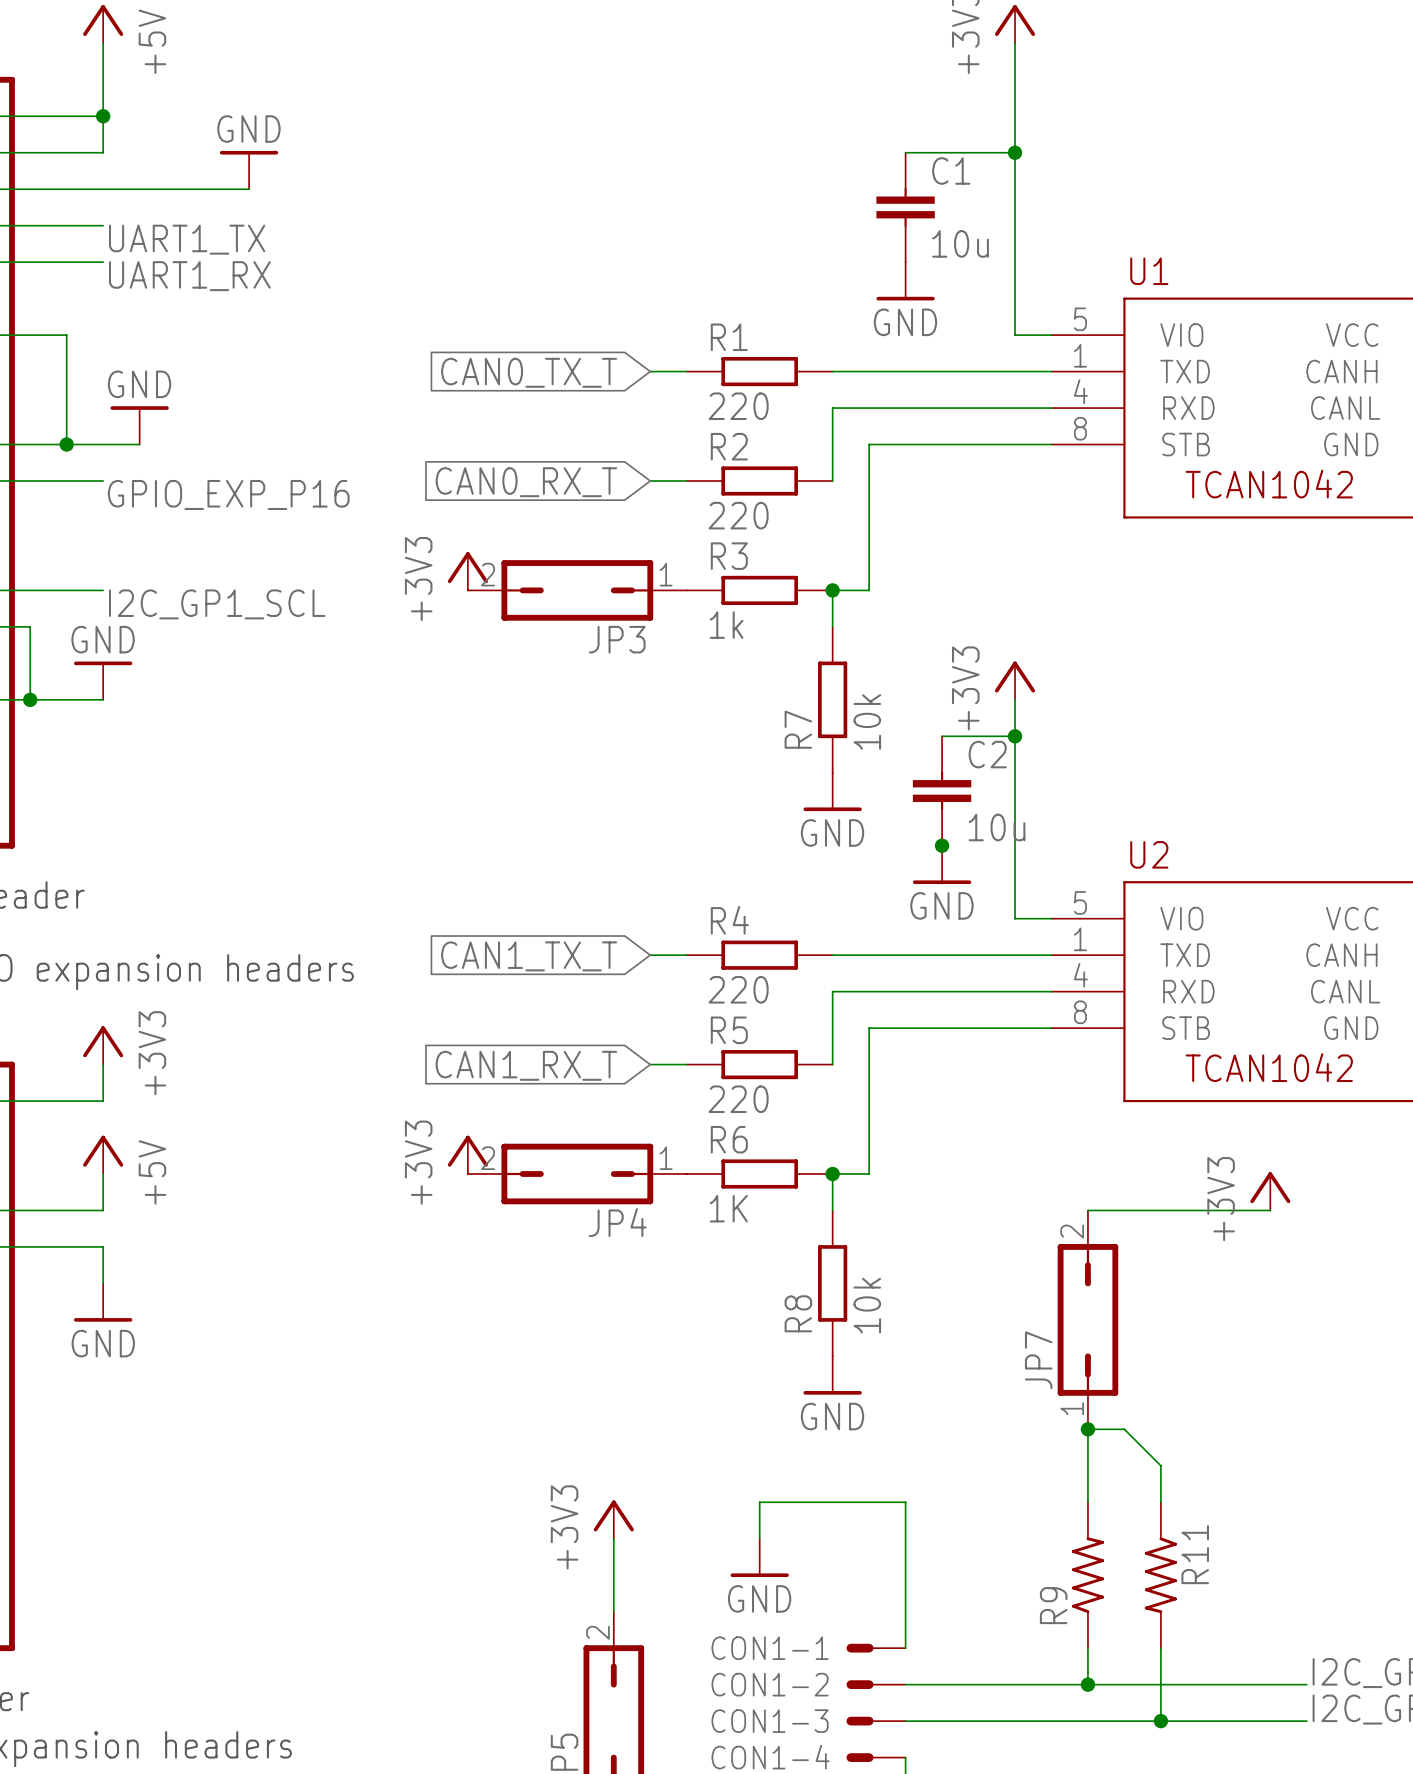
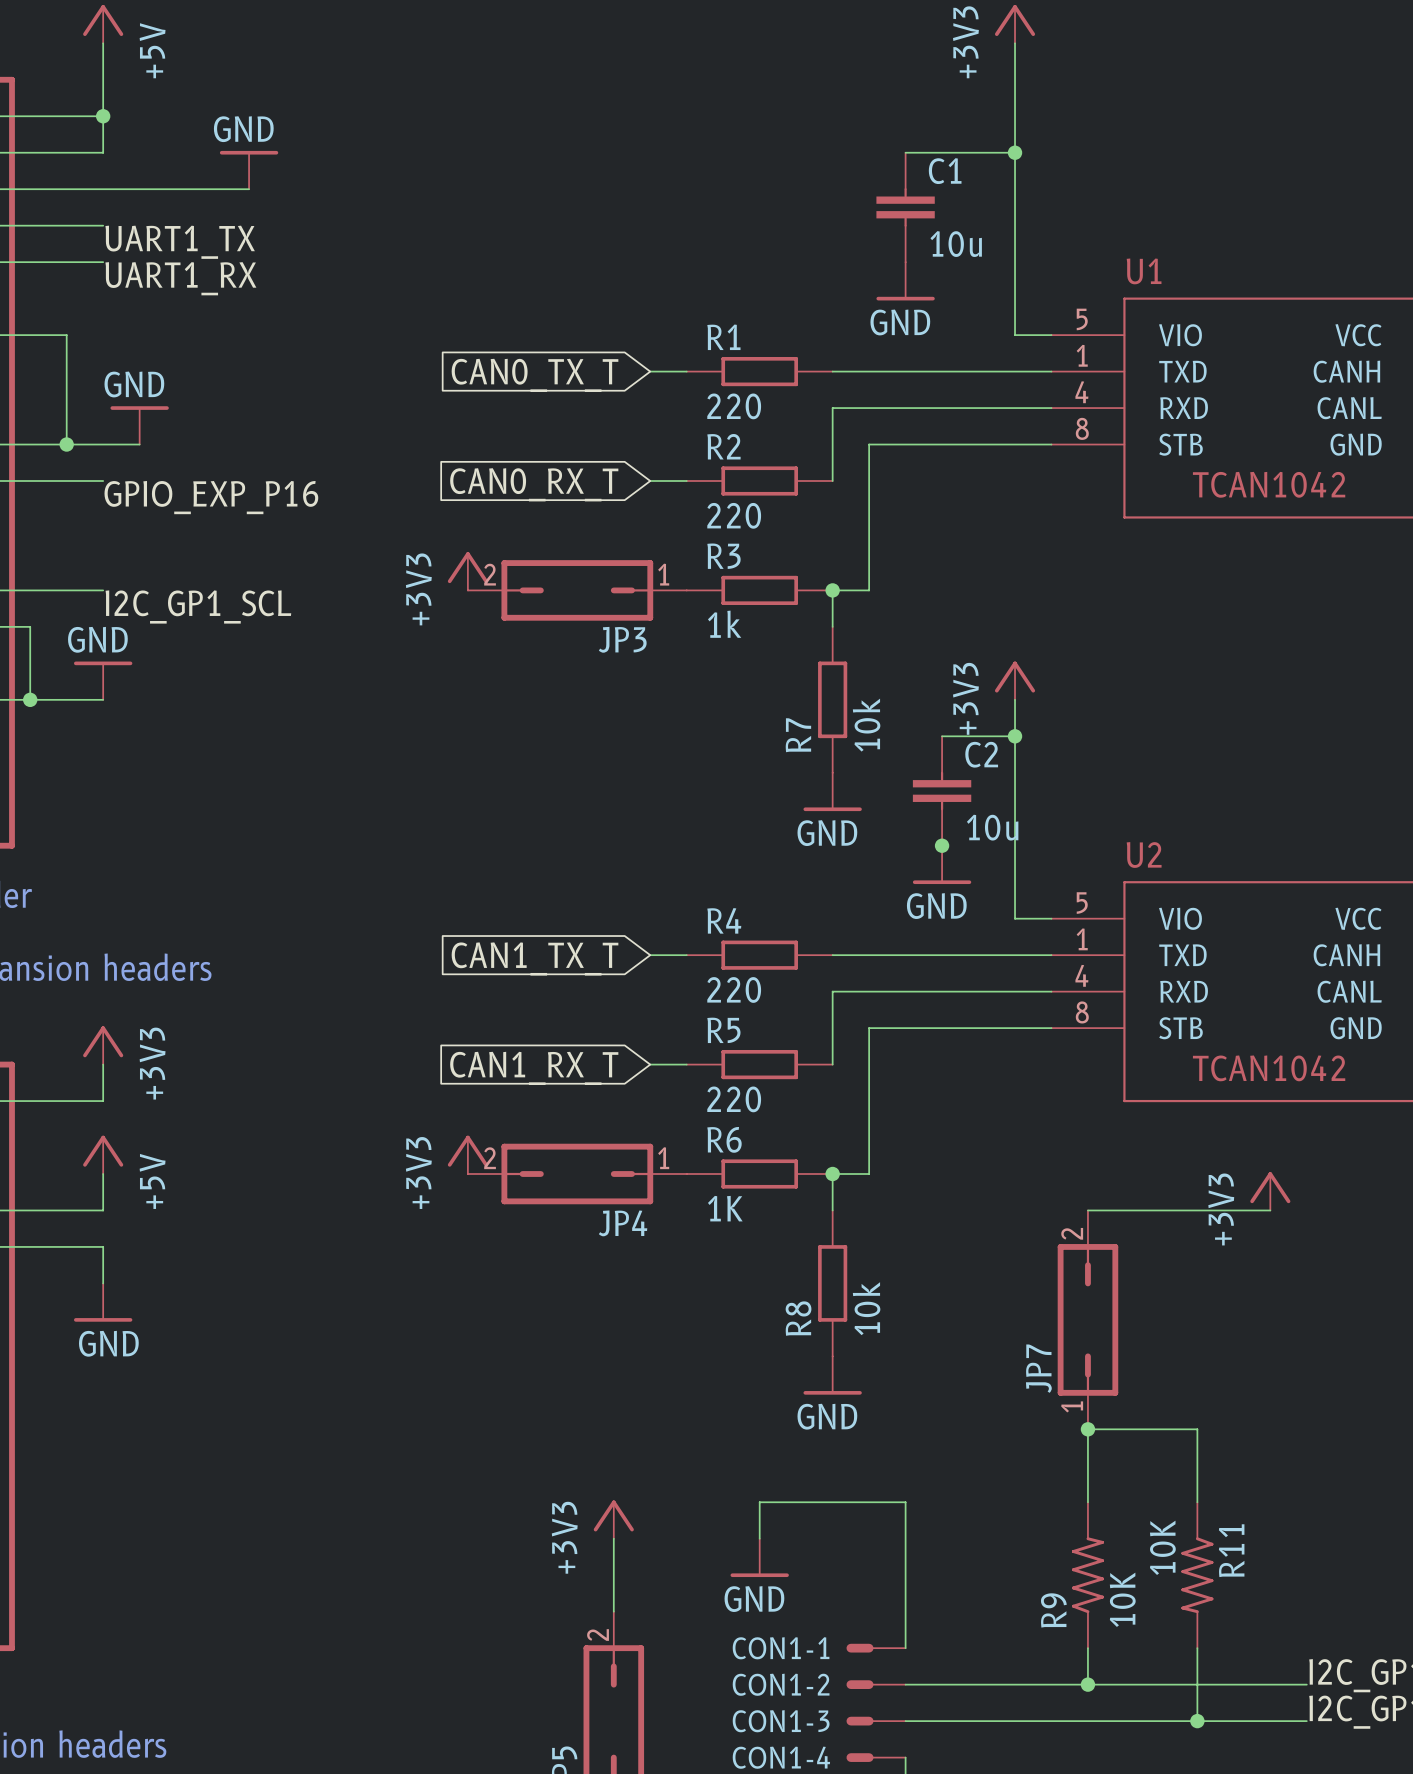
wire: (1124, 1429) (1160, 1465) (1160, 1502) -> (1124, 1429) (1197, 1429) (1197, 1502)
R11 value: none -> 10K (1162, 1547)
R11 position: (1160, 1575) -> (1197, 1575)
R9 value: none -> 10K (1122, 1599)
wire: (1160, 1648) (1160, 1721) -> (1197, 1648) (1197, 1721)
junction position: (1160, 1721) -> (1197, 1721)

